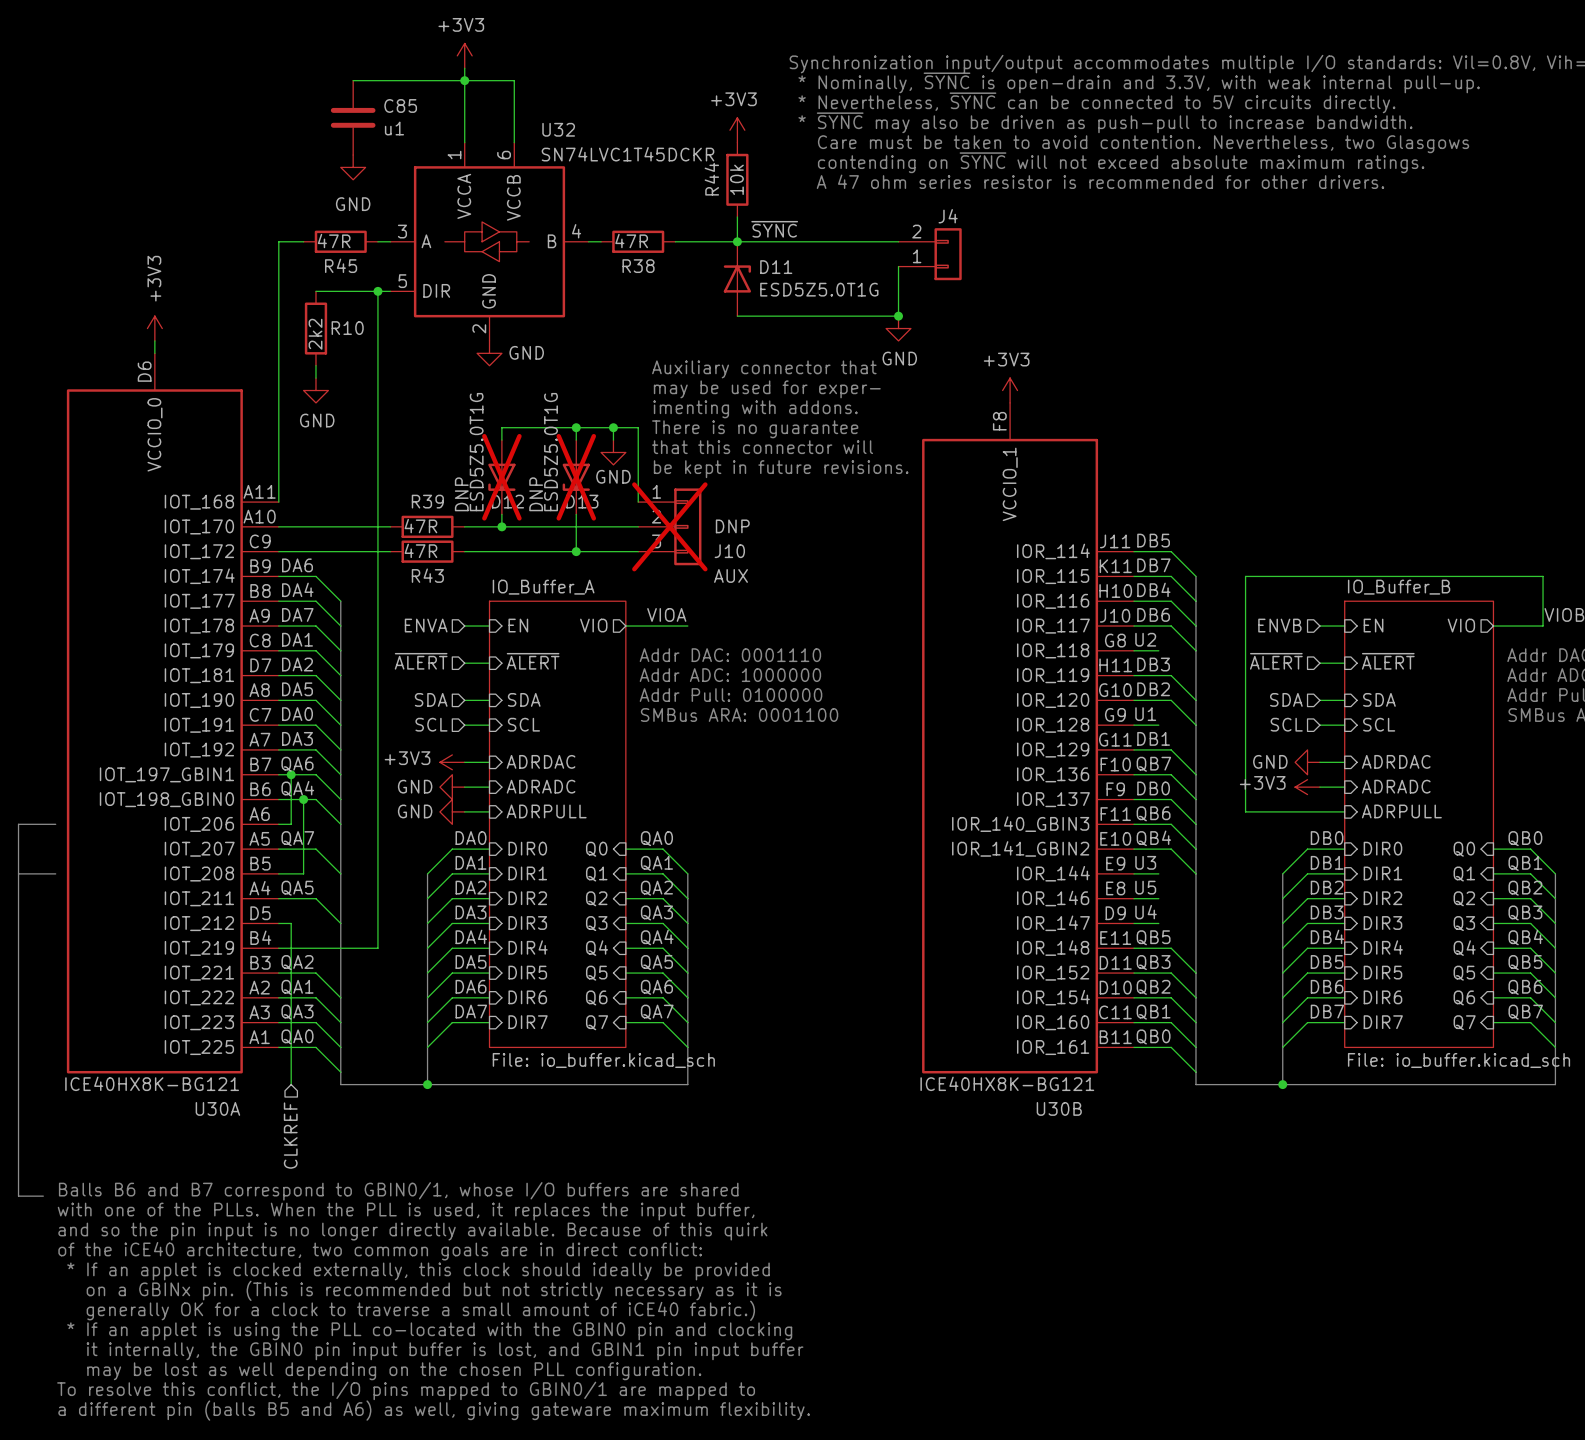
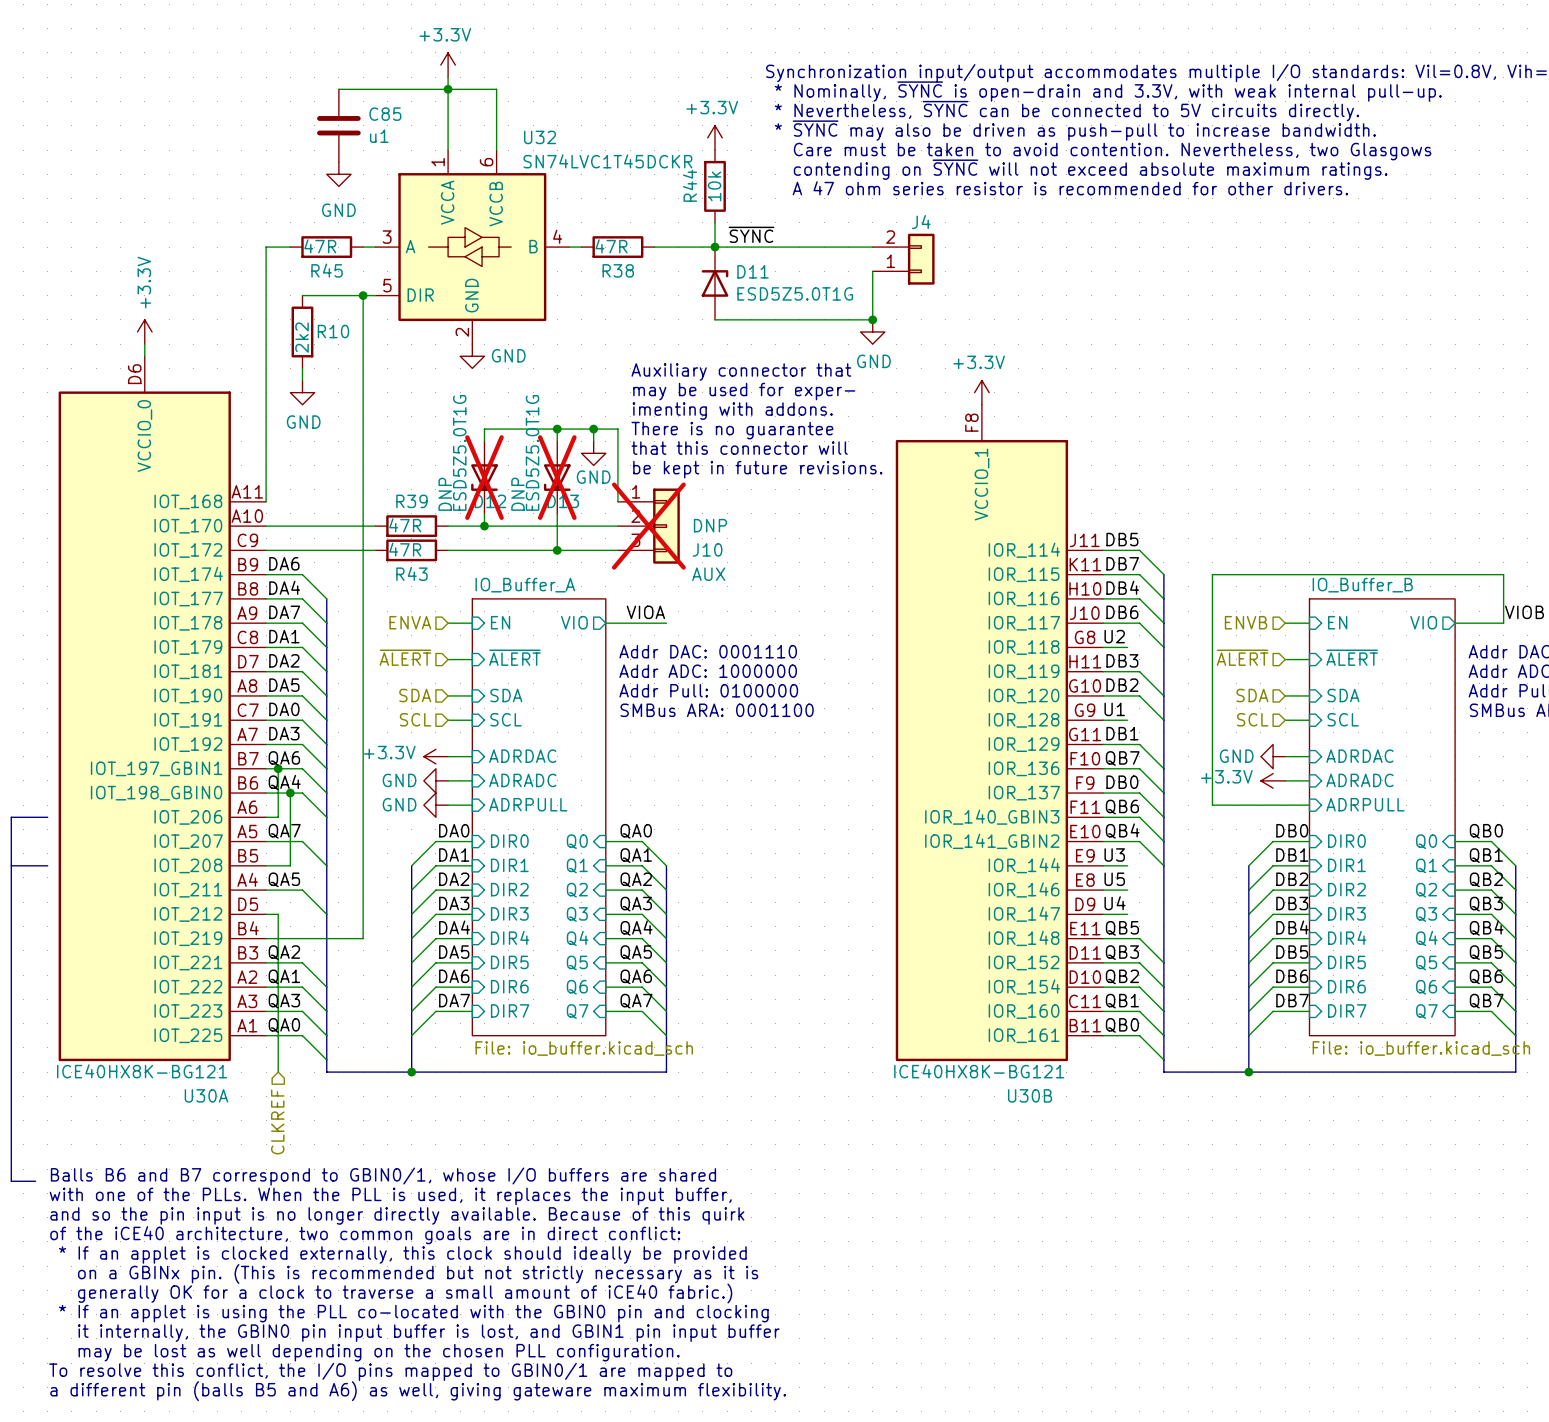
power symbol: +3V3 (464, 55) -> +3.3V (448, 65)
power symbol: +3V3 (737, 130) -> +3.3V (714, 137)
power symbol: +3V3 (154, 328) -> +3.3V (144, 331)
power symbol: +3V3 (1010, 390) -> +3.3V (981, 392)
power symbol: +3V3 (452, 762) -> +3.3V (435, 756)
power symbol: +3V3 (1307, 787) -> +3.3V (1273, 780)

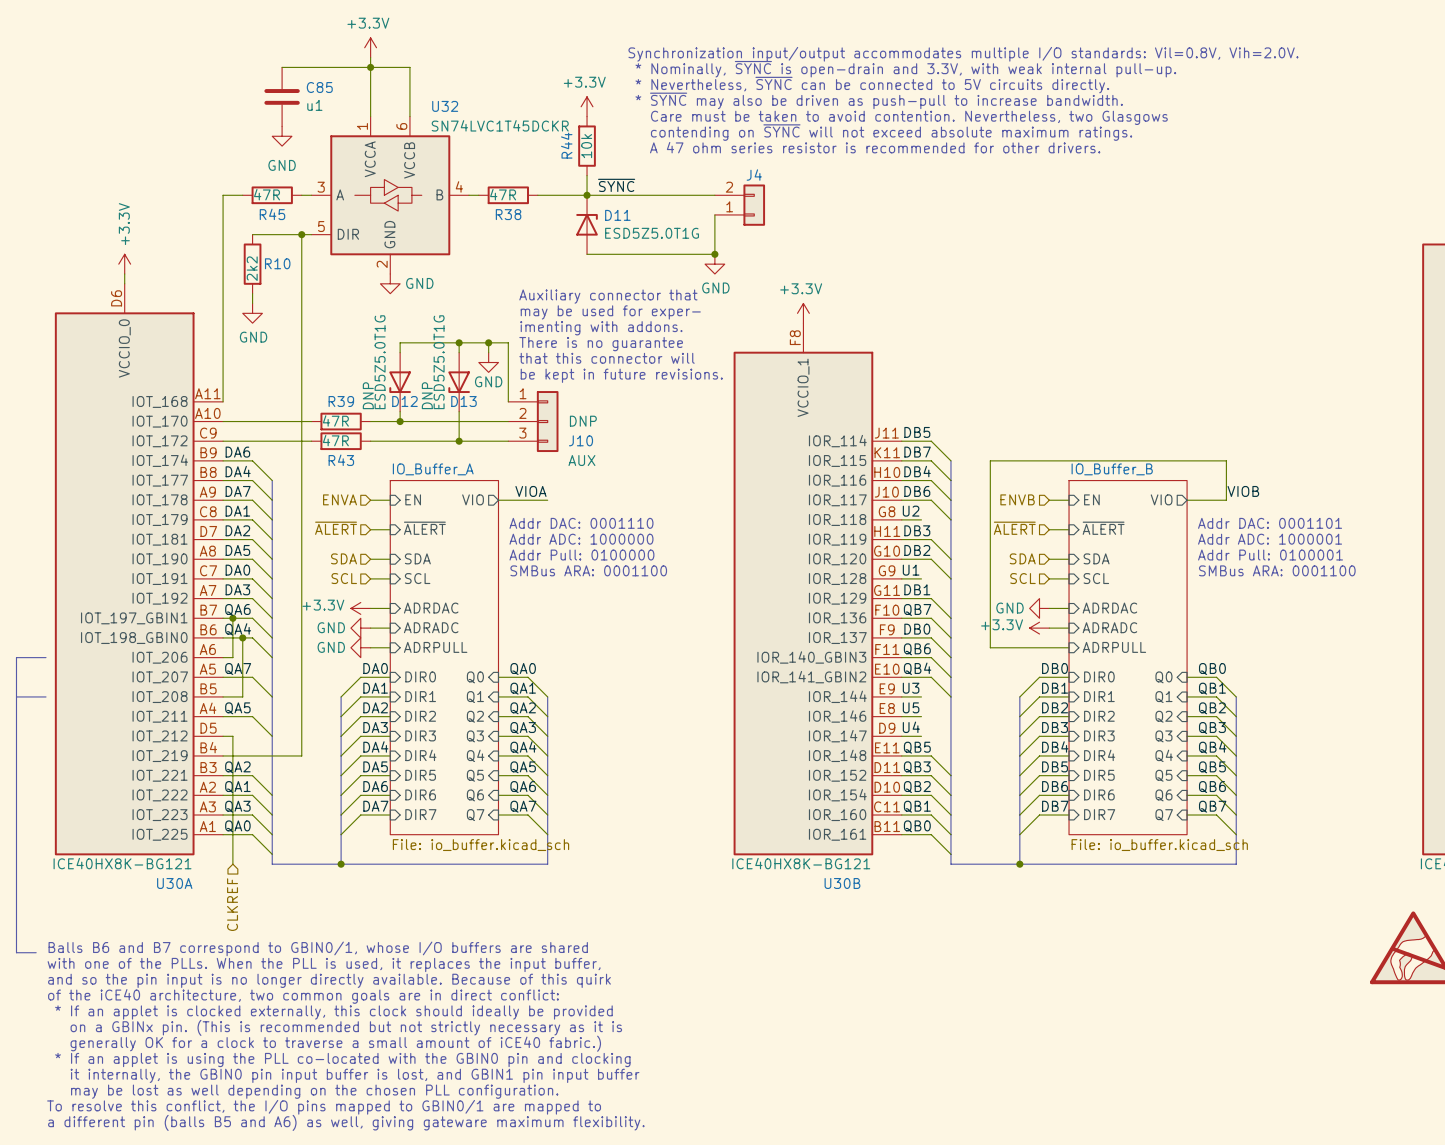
D12 do-not-place cross: (484, 477) -> none
D13 do-not-place cross: (557, 477) -> none
J10 do-not-place cross: (648, 526) -> none

